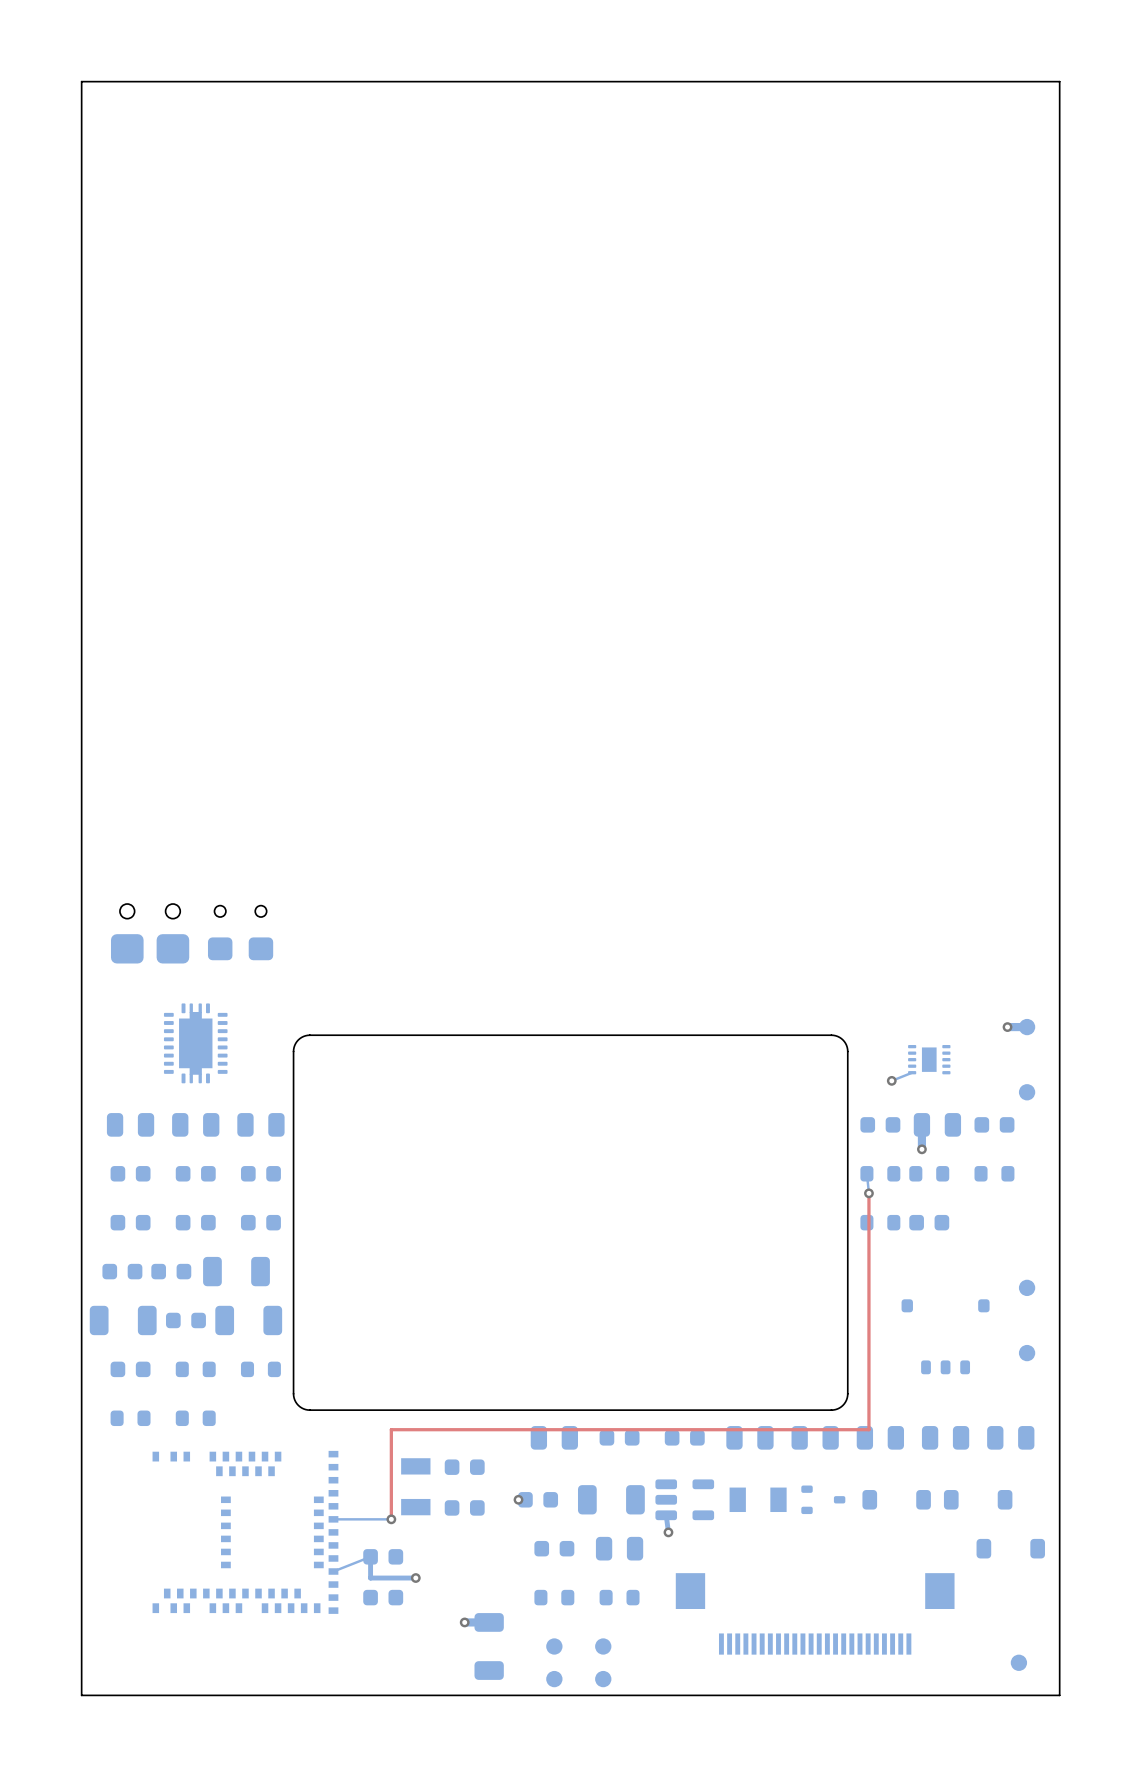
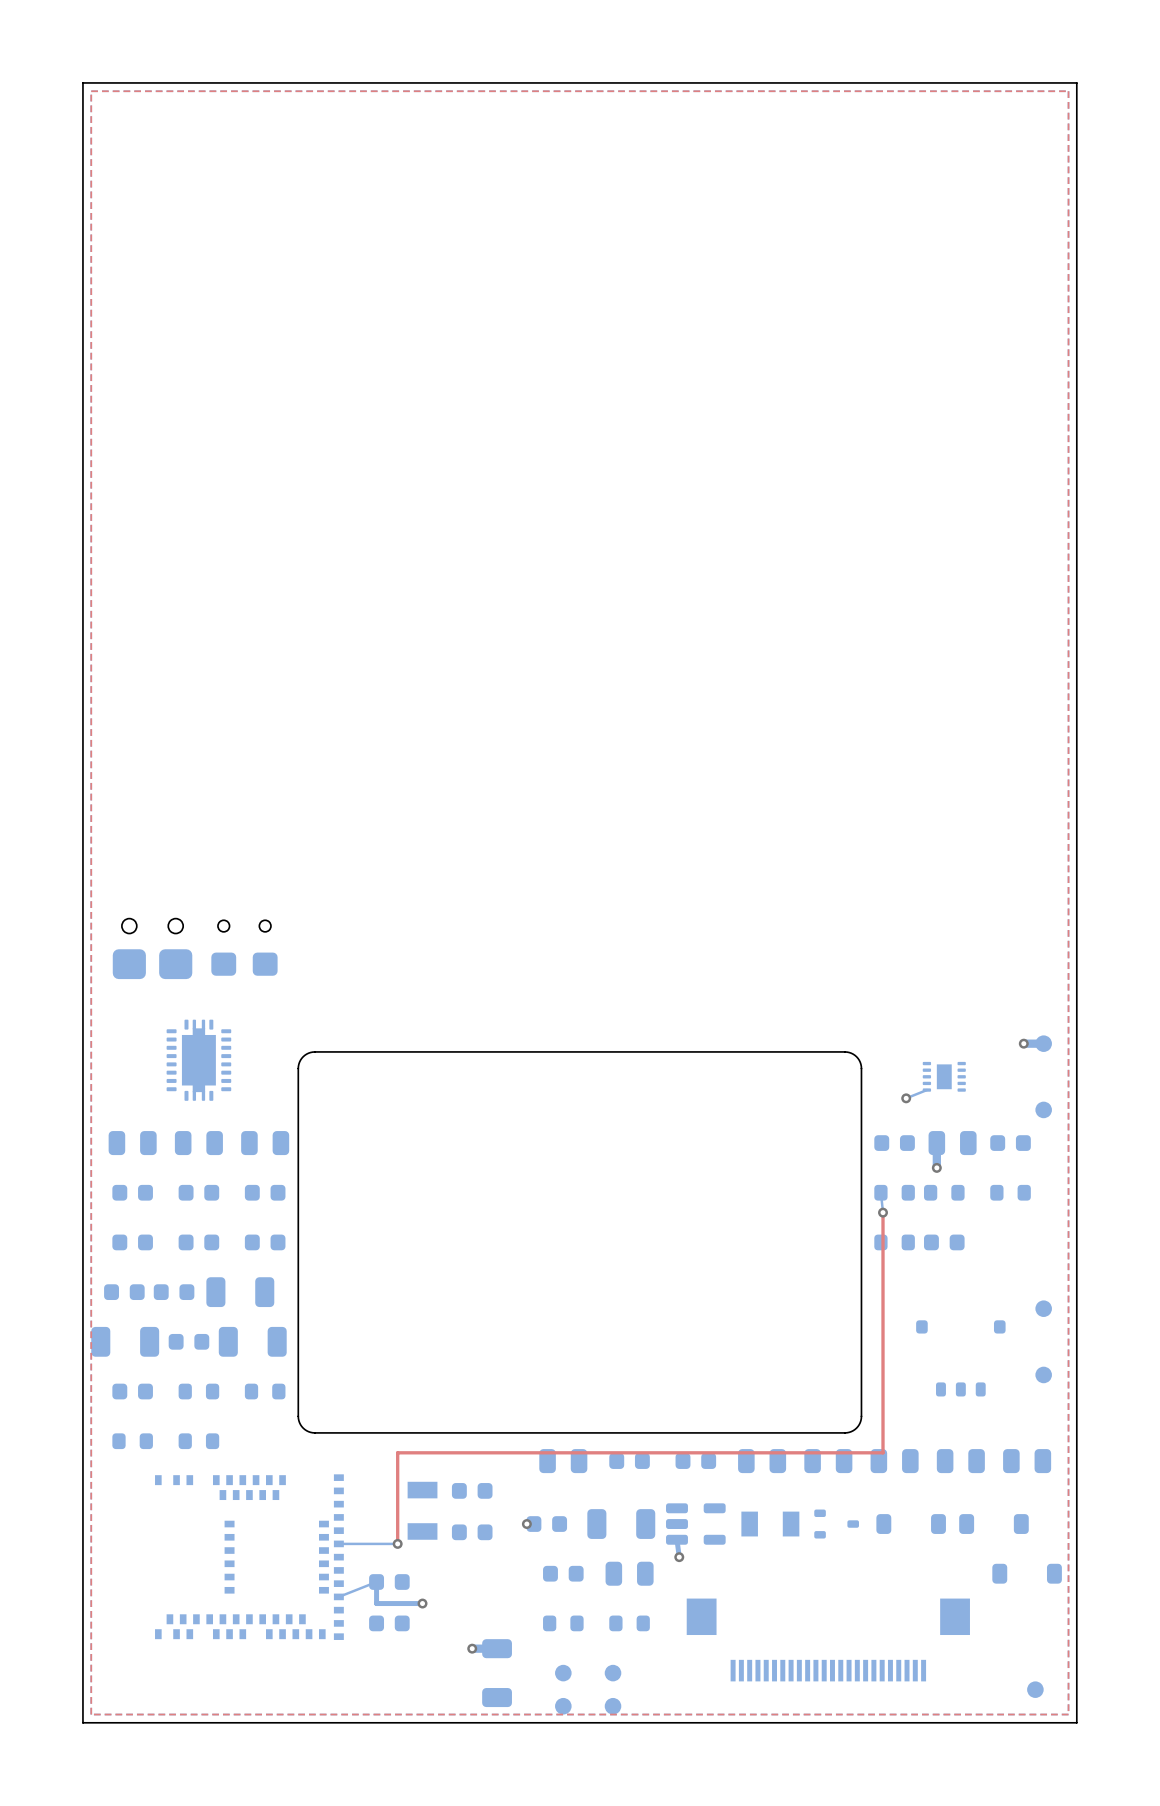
top zone outline: none -> (91, 91) (1068, 91) (1068, 1714) (91, 1714) (91, 91)

